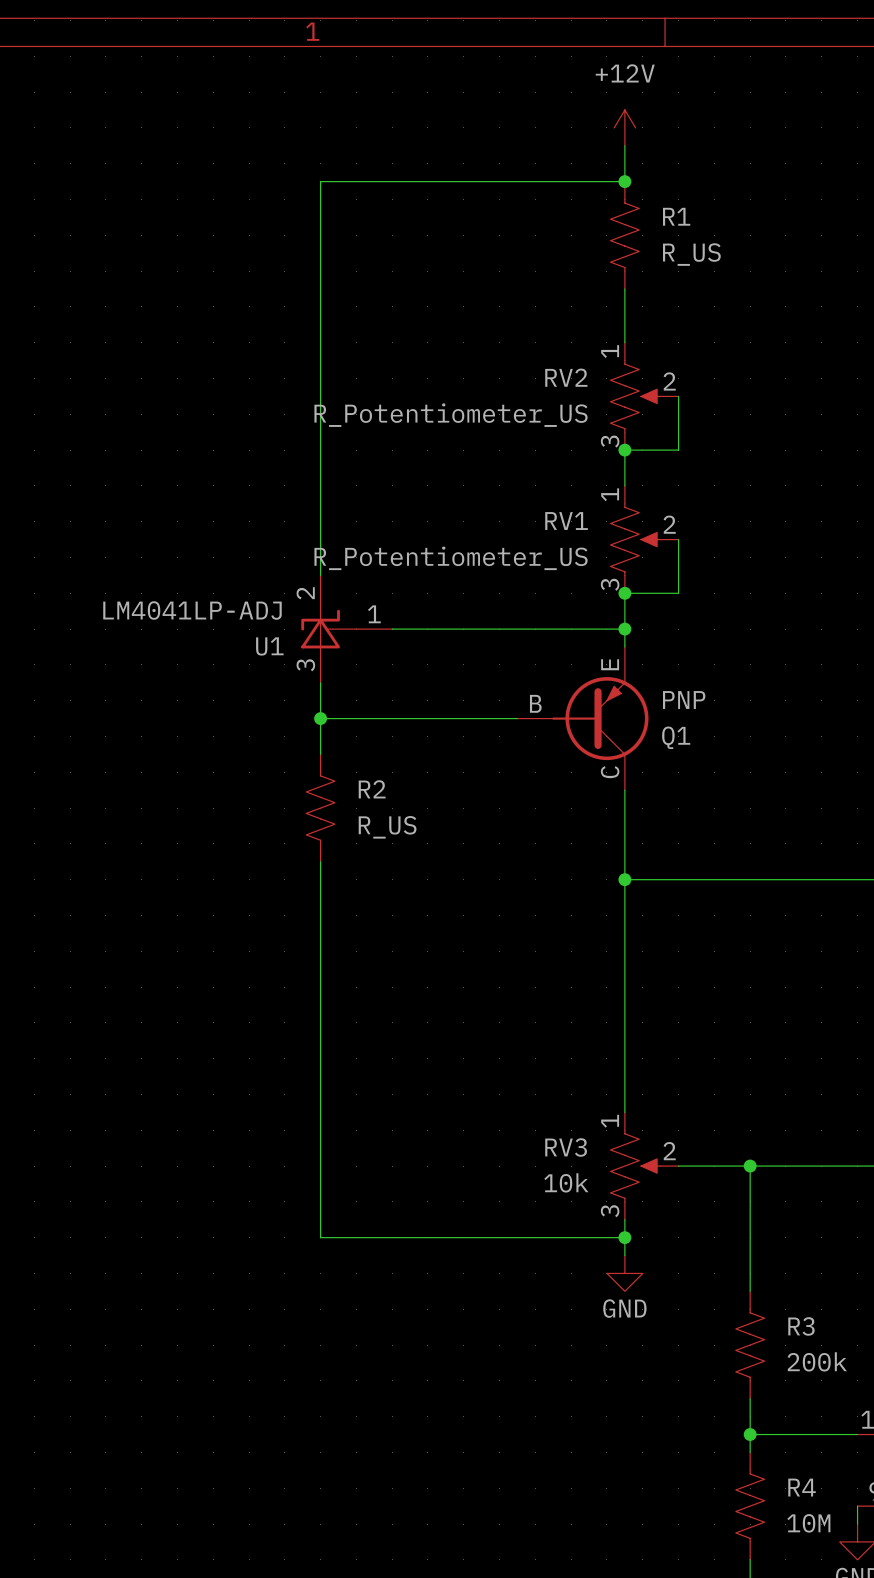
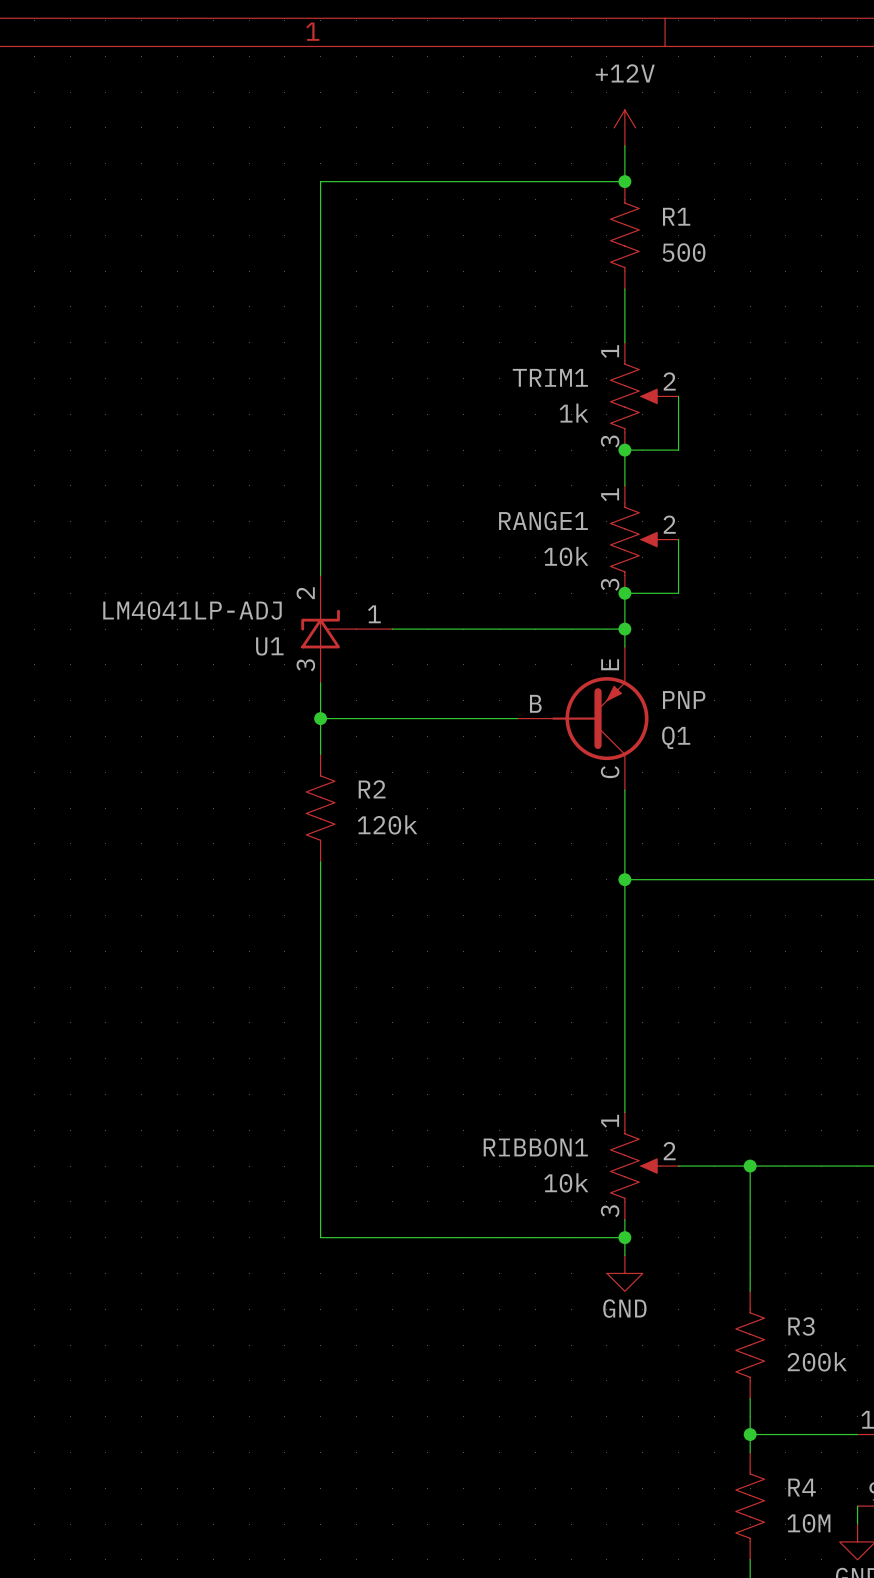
R1 value: R_US (691, 254) -> 500 (683, 252)
RV2 name: RV2 (566, 377) -> TRIM1 (550, 377)
RV2 value: R_Potentiometer_US (451, 415) -> 1k (574, 413)
RV1 name: RV1 (566, 521) -> RANGE1 (543, 521)
RV1 value: R_Potentiometer_US (451, 558) -> 10k (566, 556)
R2 value: R_US (387, 827) -> 120k (387, 824)
RV3 name: RV3 (566, 1147) -> RIBBON1 (535, 1147)

